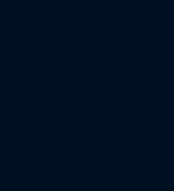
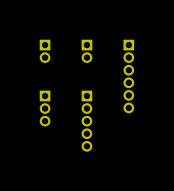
part: none -> (45, 51)
part: none -> (86, 51)
part: none -> (128, 76)
part: none -> (45, 108)
part: none -> (86, 121)

